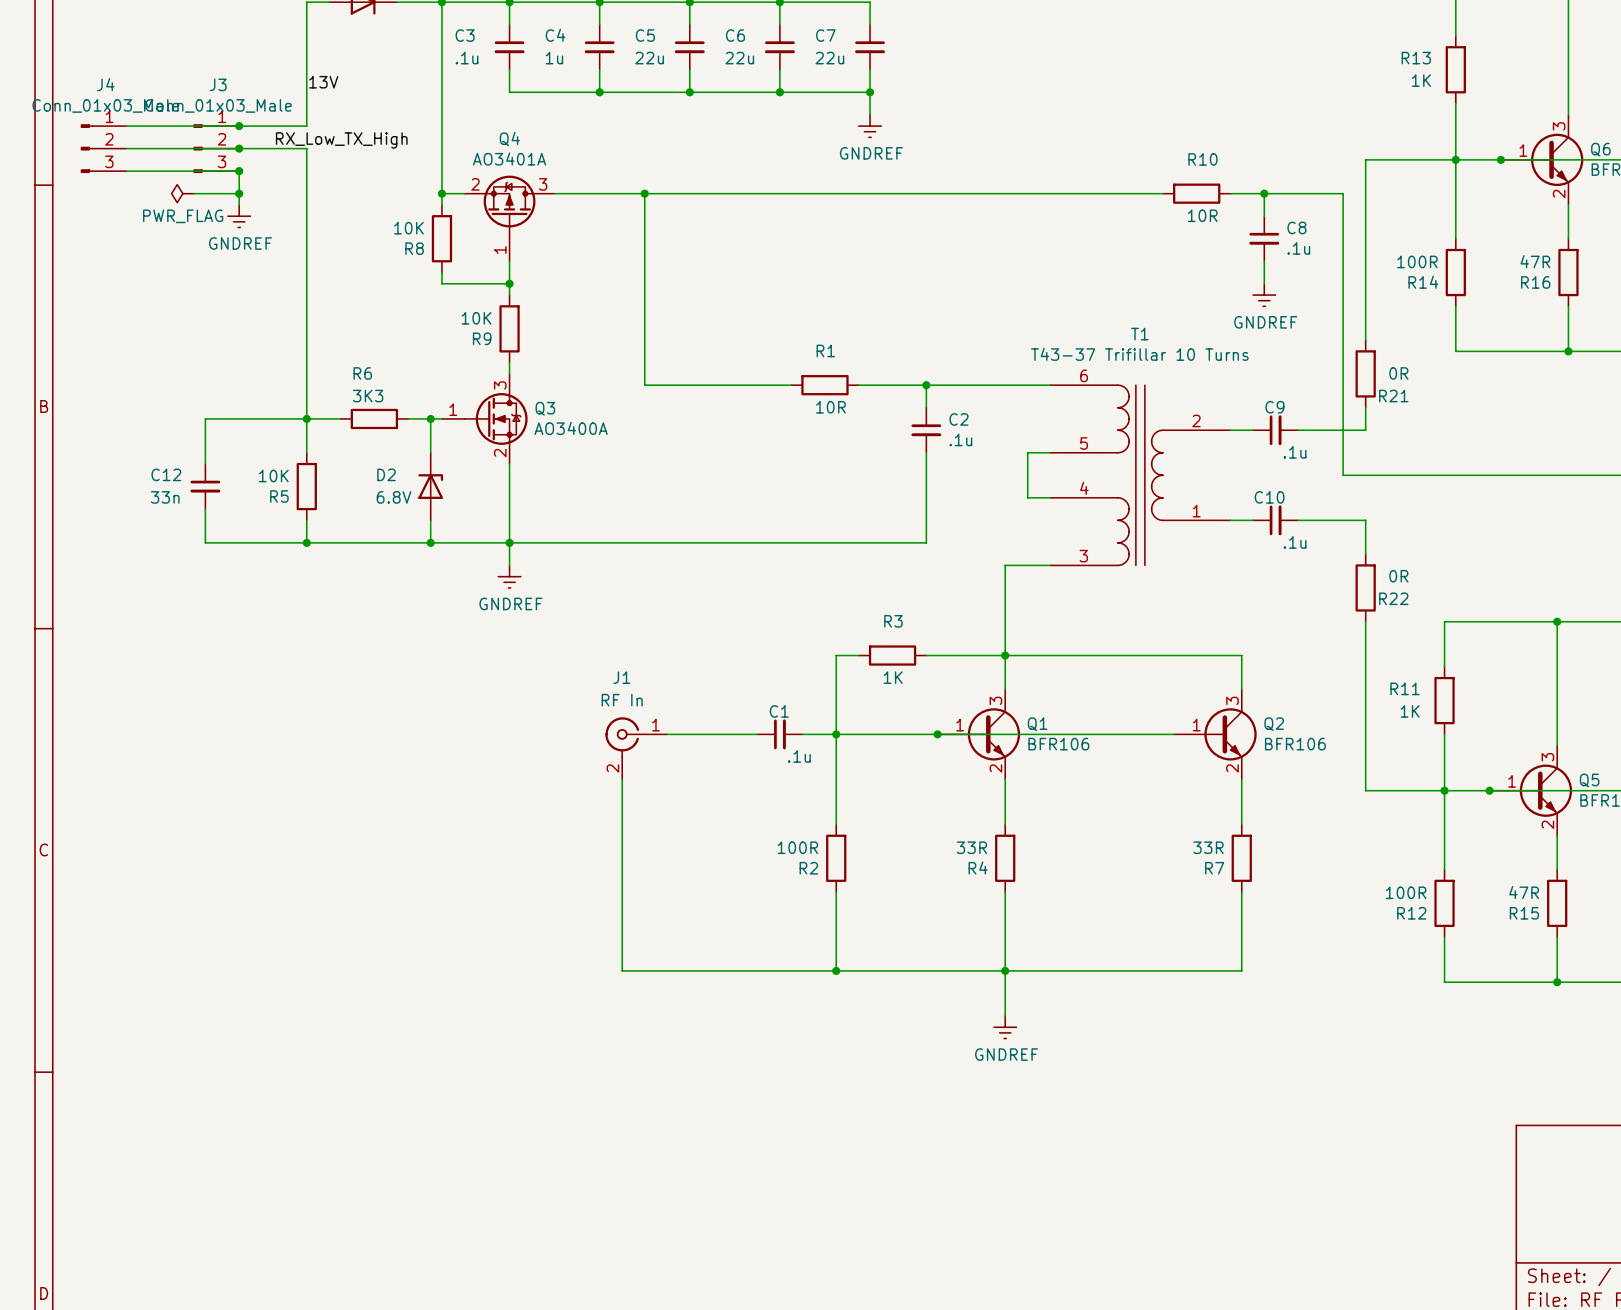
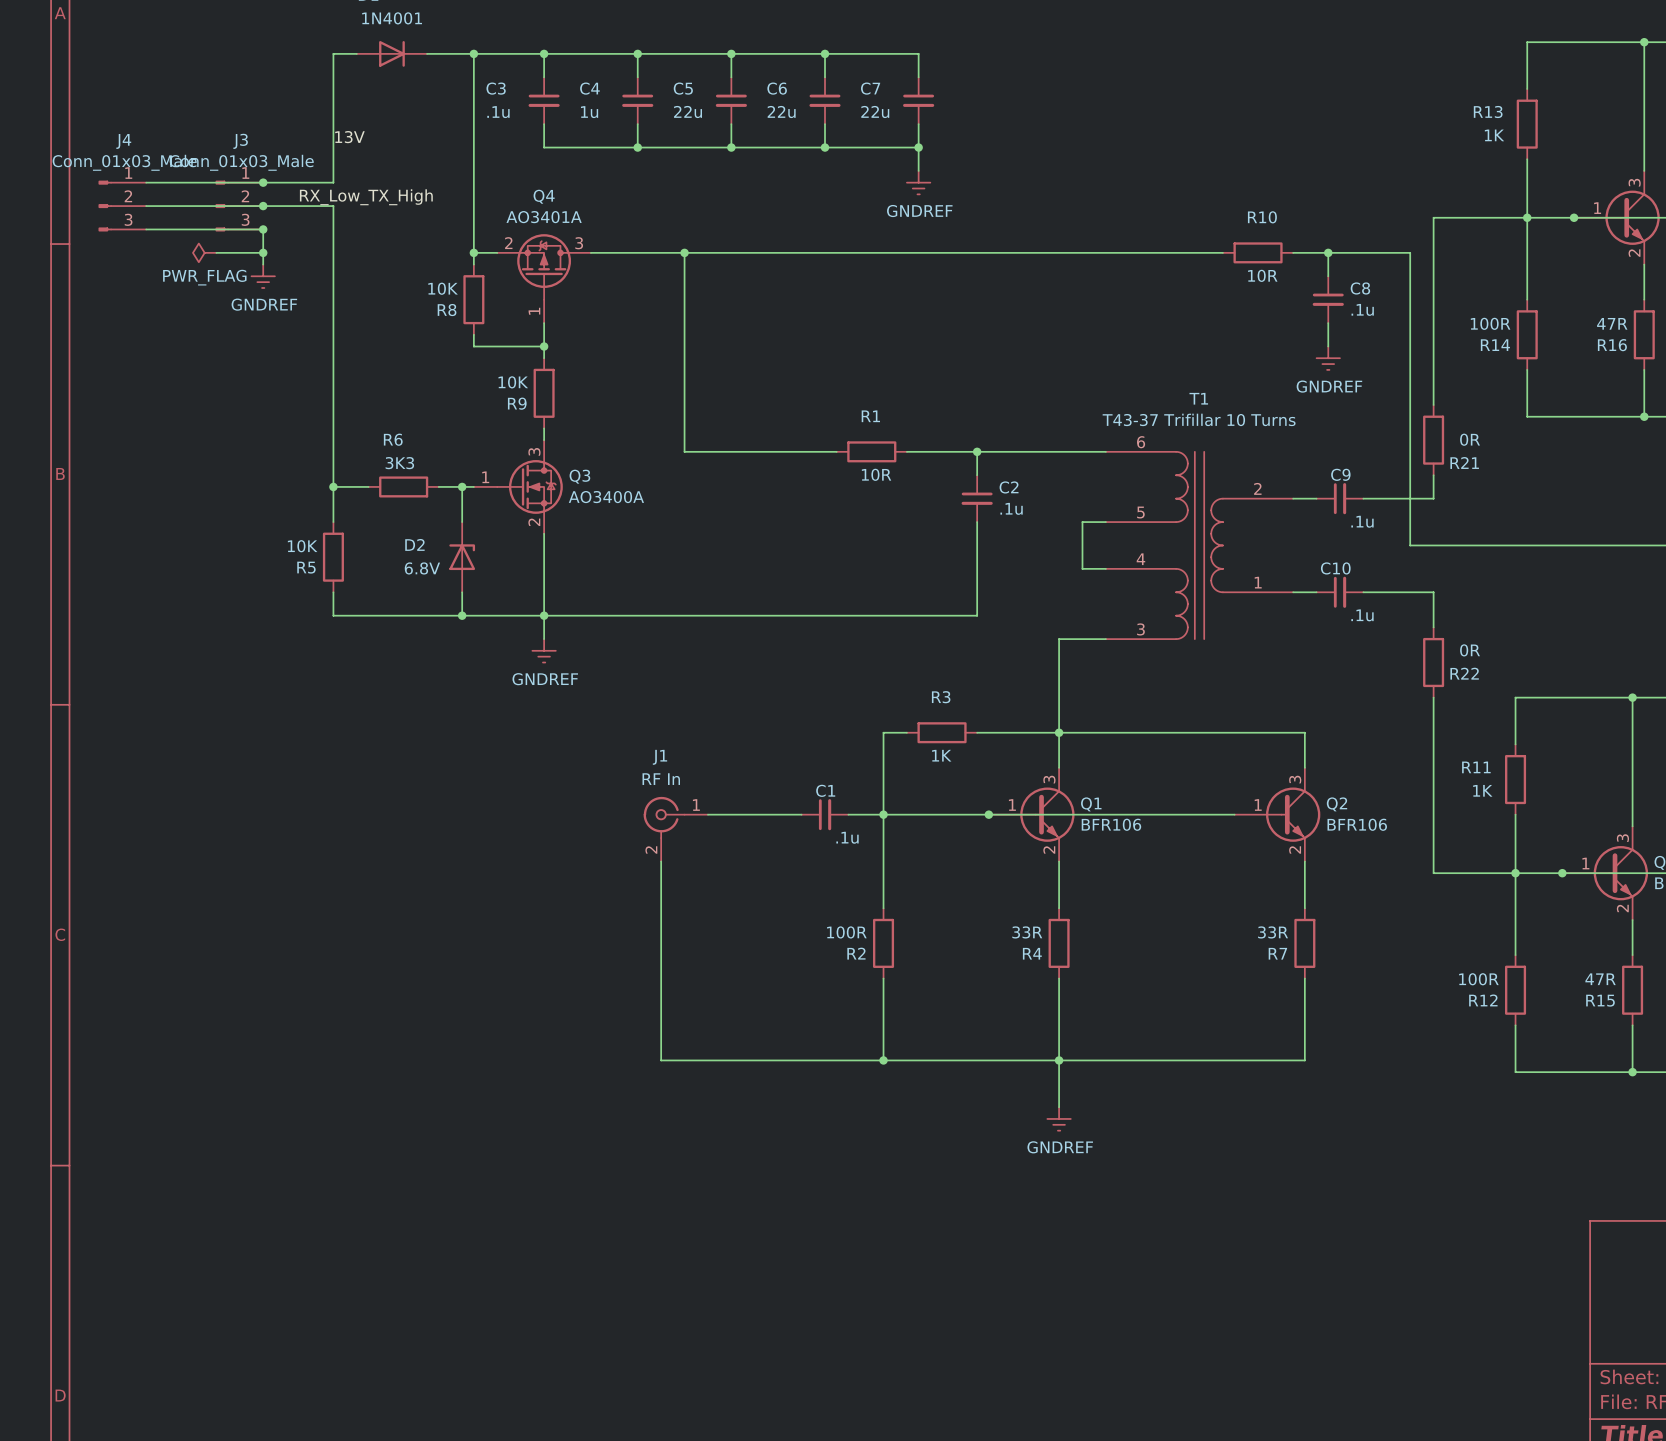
wire: (306, 418) (205, 418) (205, 464) -> none
C12: 33n (205, 486) -> none
wire: (205, 509) (205, 542) (306, 542) -> none
junction: (306, 542) -> none

